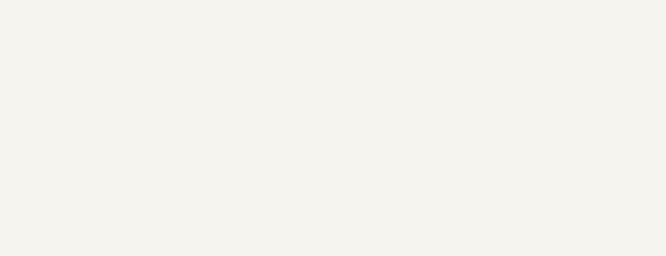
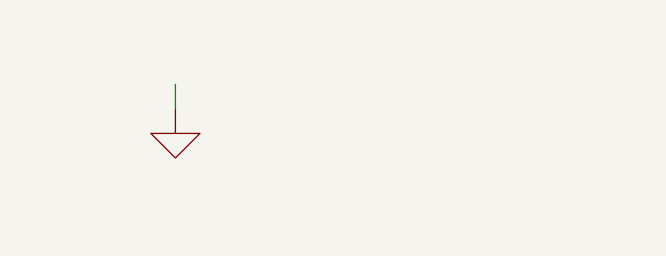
wire: none -> (175, 84) (175, 108)
power symbol: none -> (175, 133)

